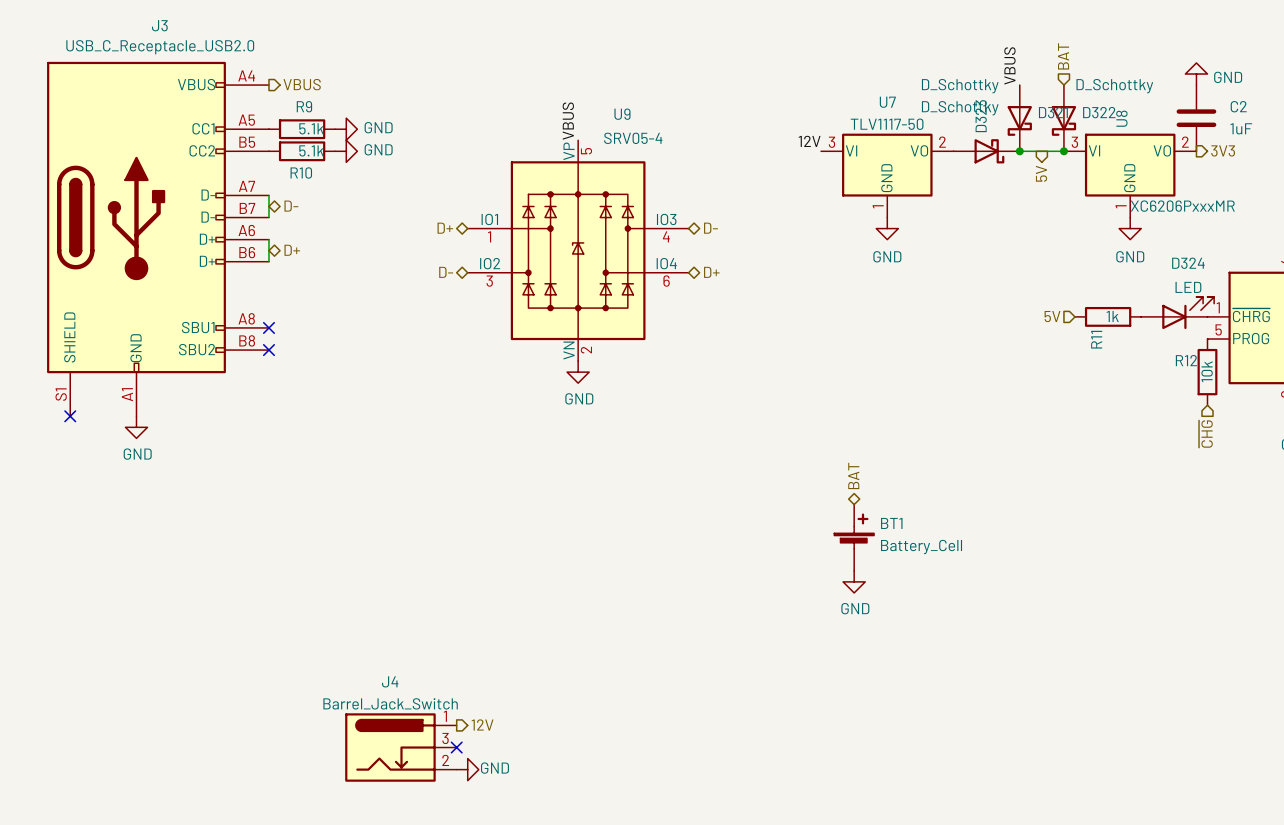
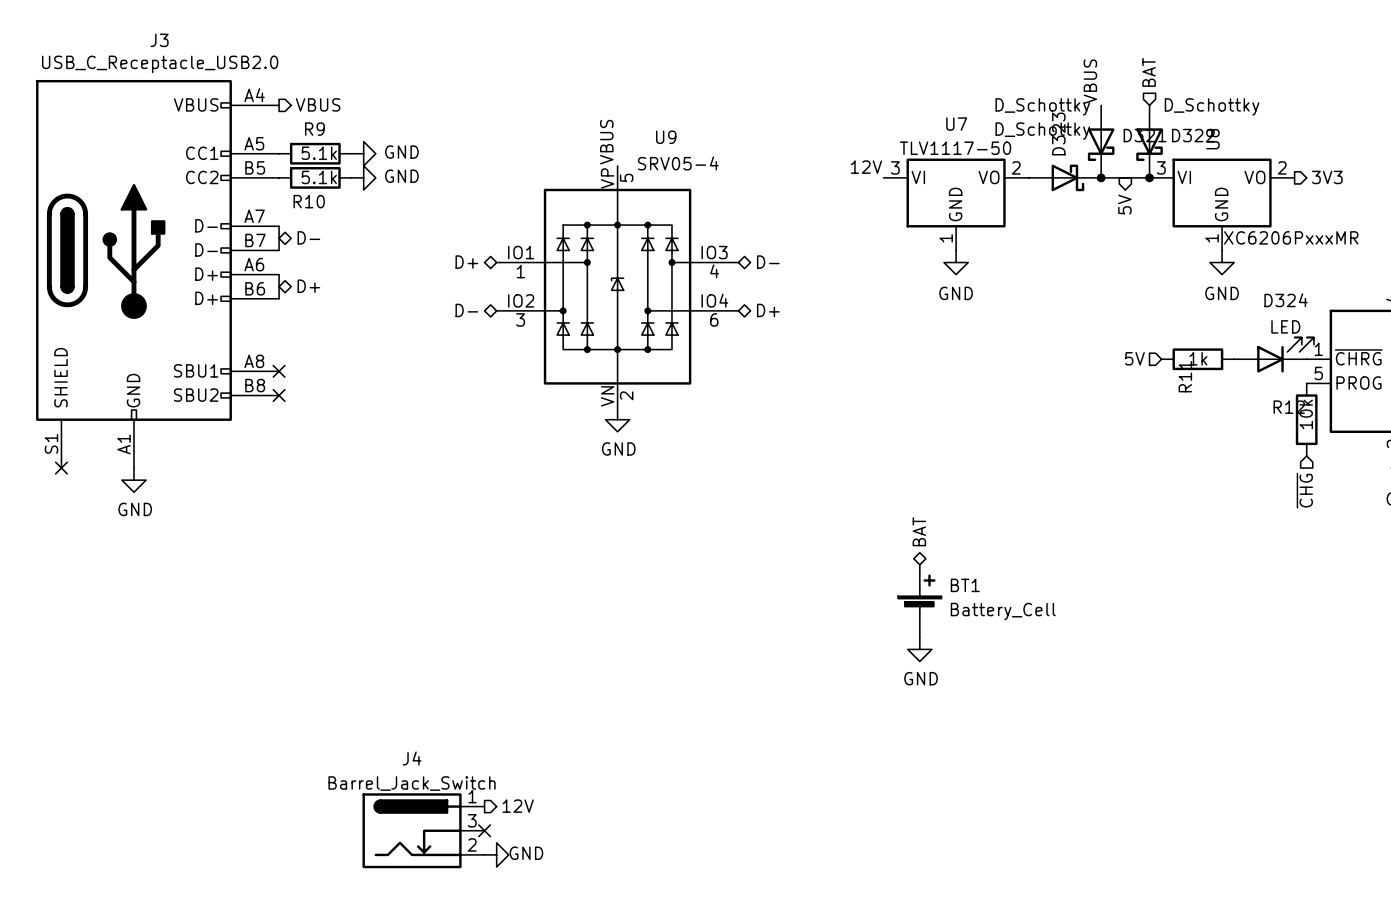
power symbol: GND (1196, 74) -> none
C2: 1uF (1196, 118) -> none

